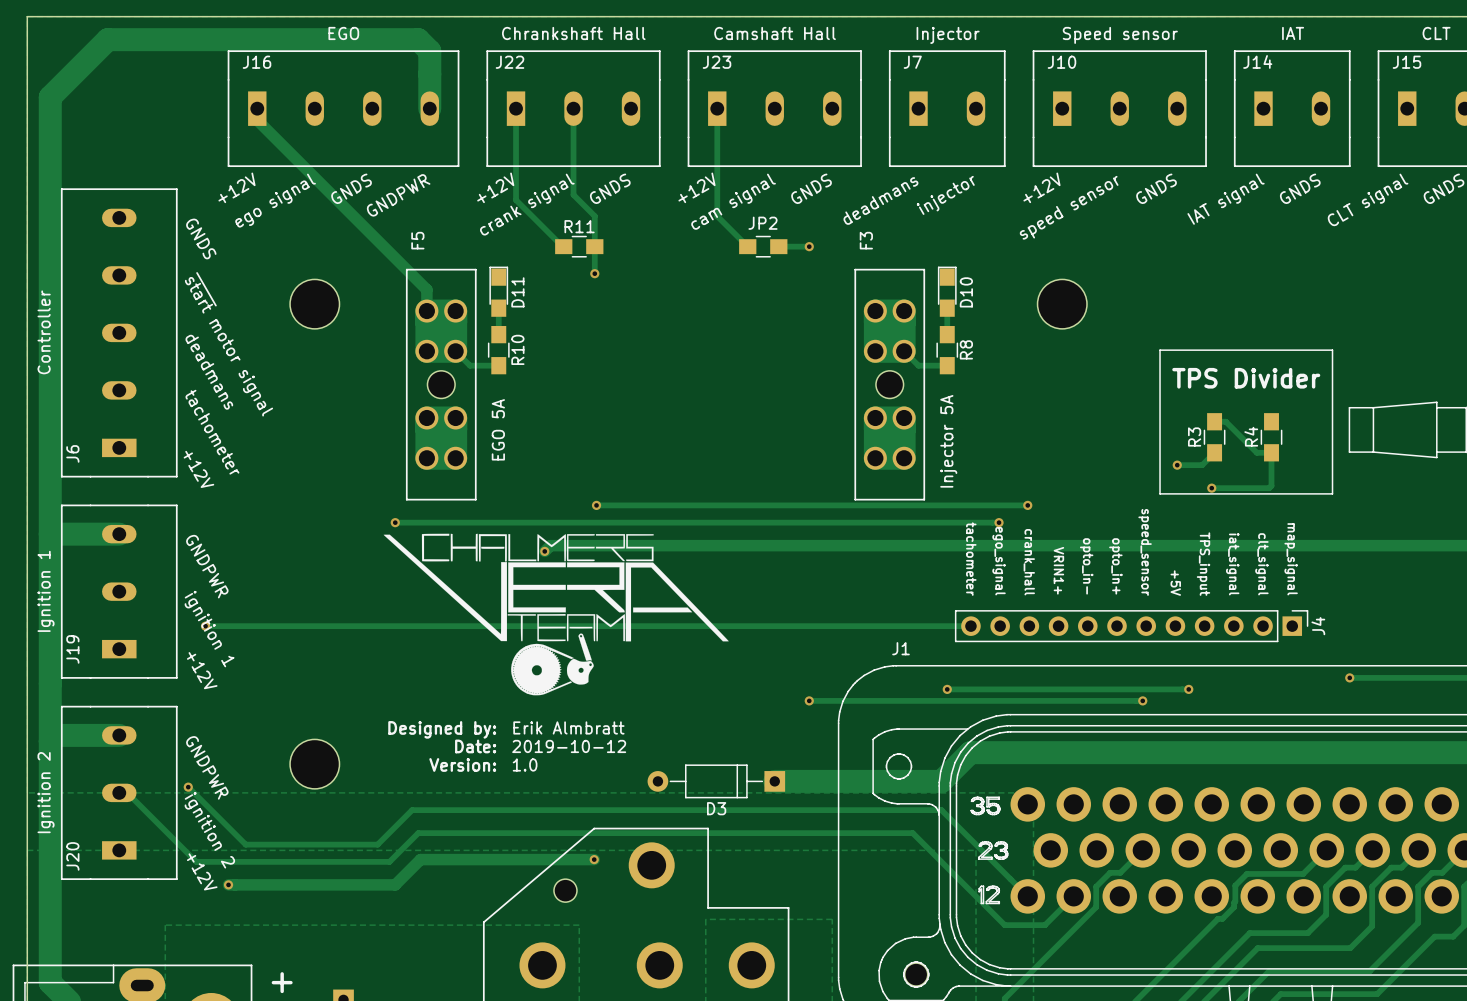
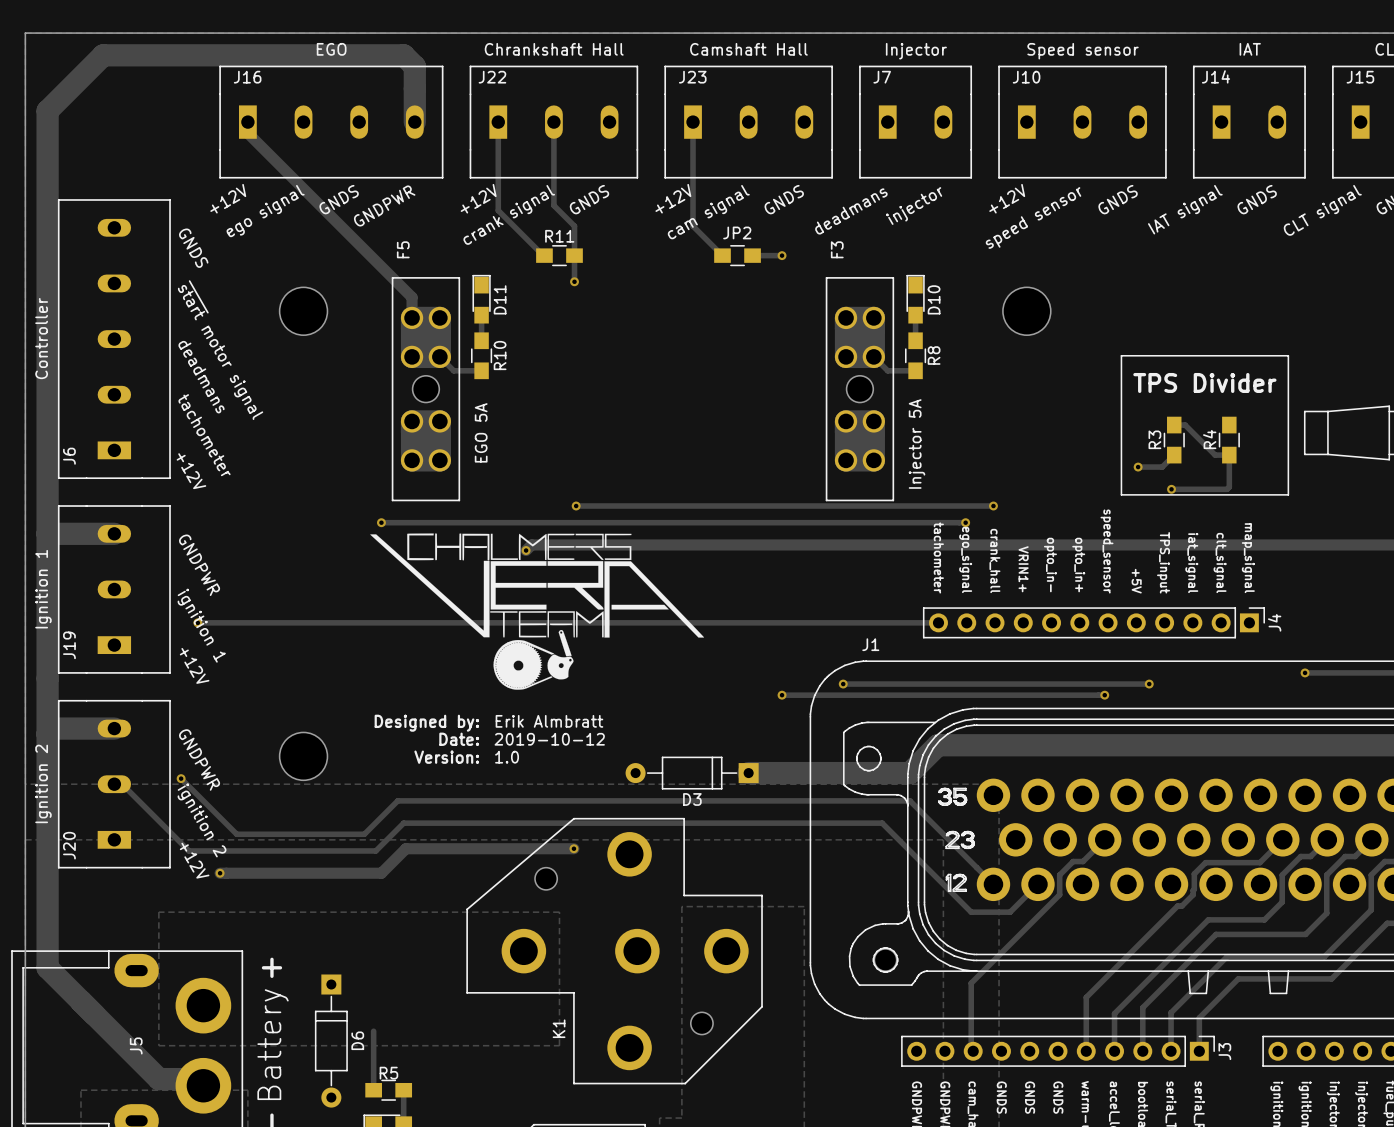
track: none -> (843, 684) (915, 684)
via: none -> (843, 684)
via: (947, 689) -> none

